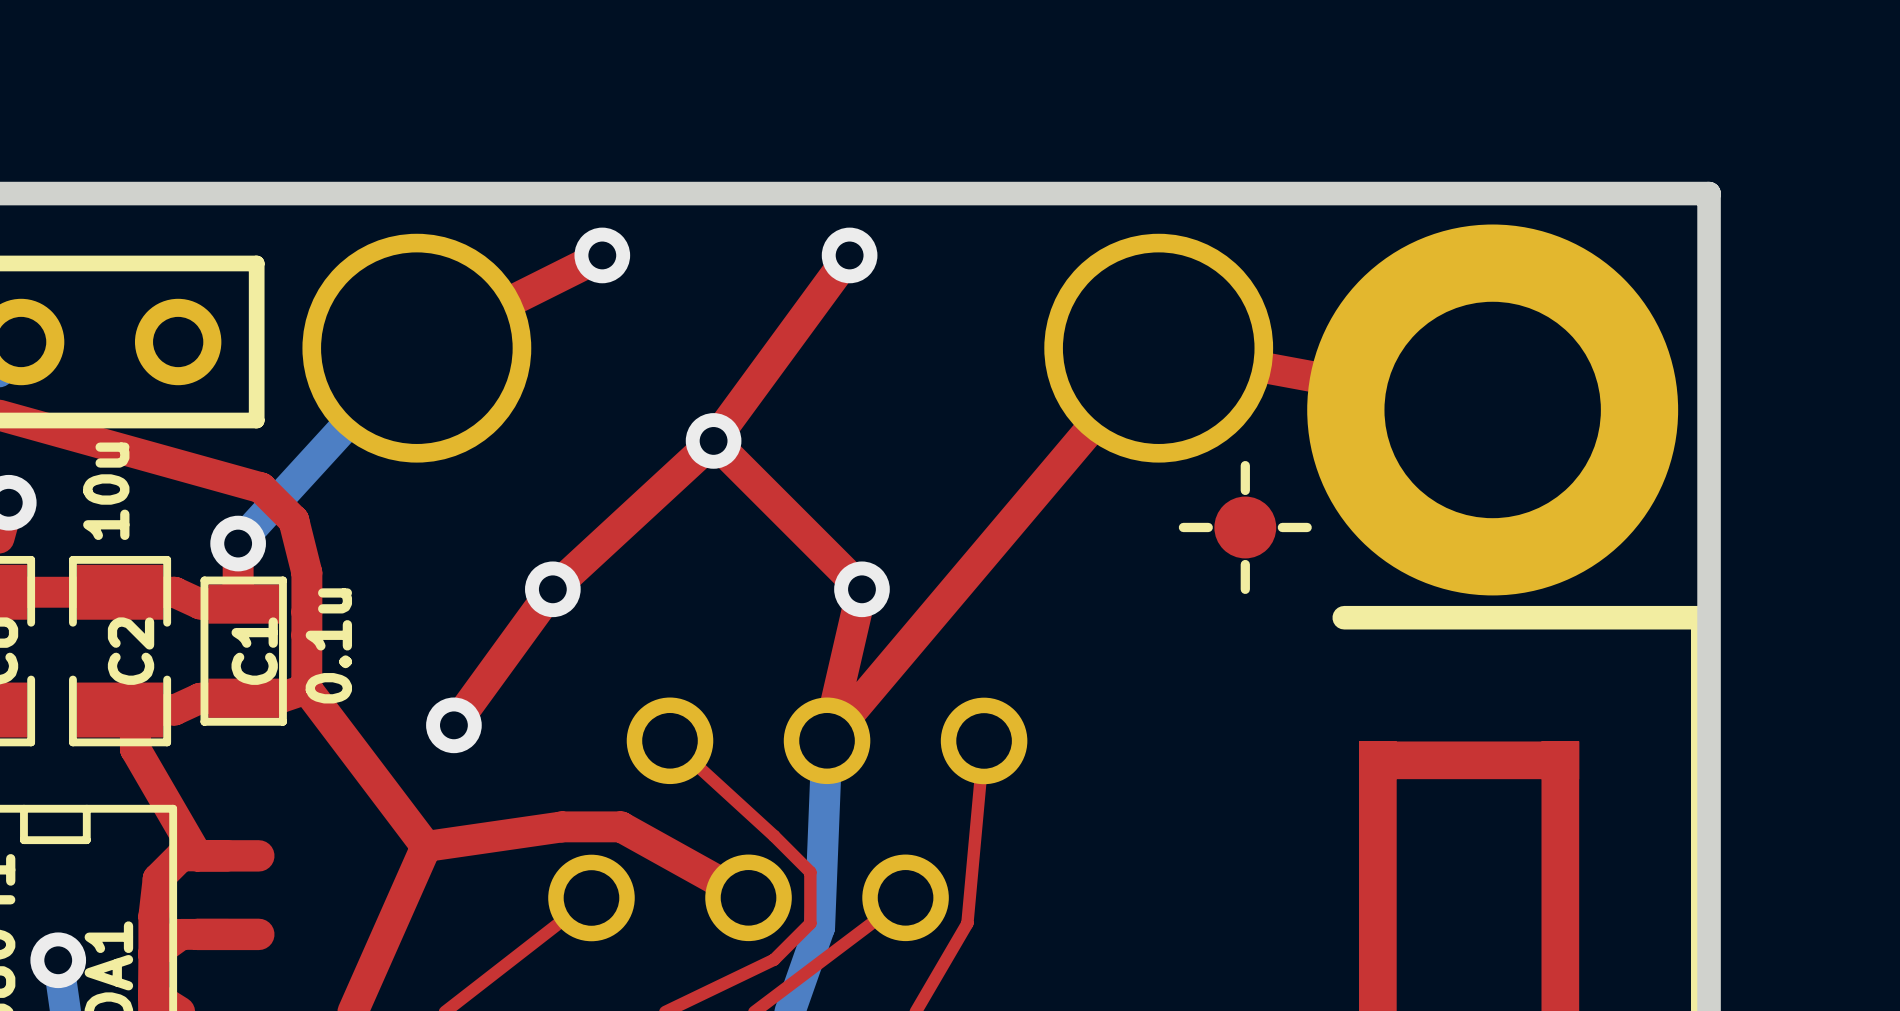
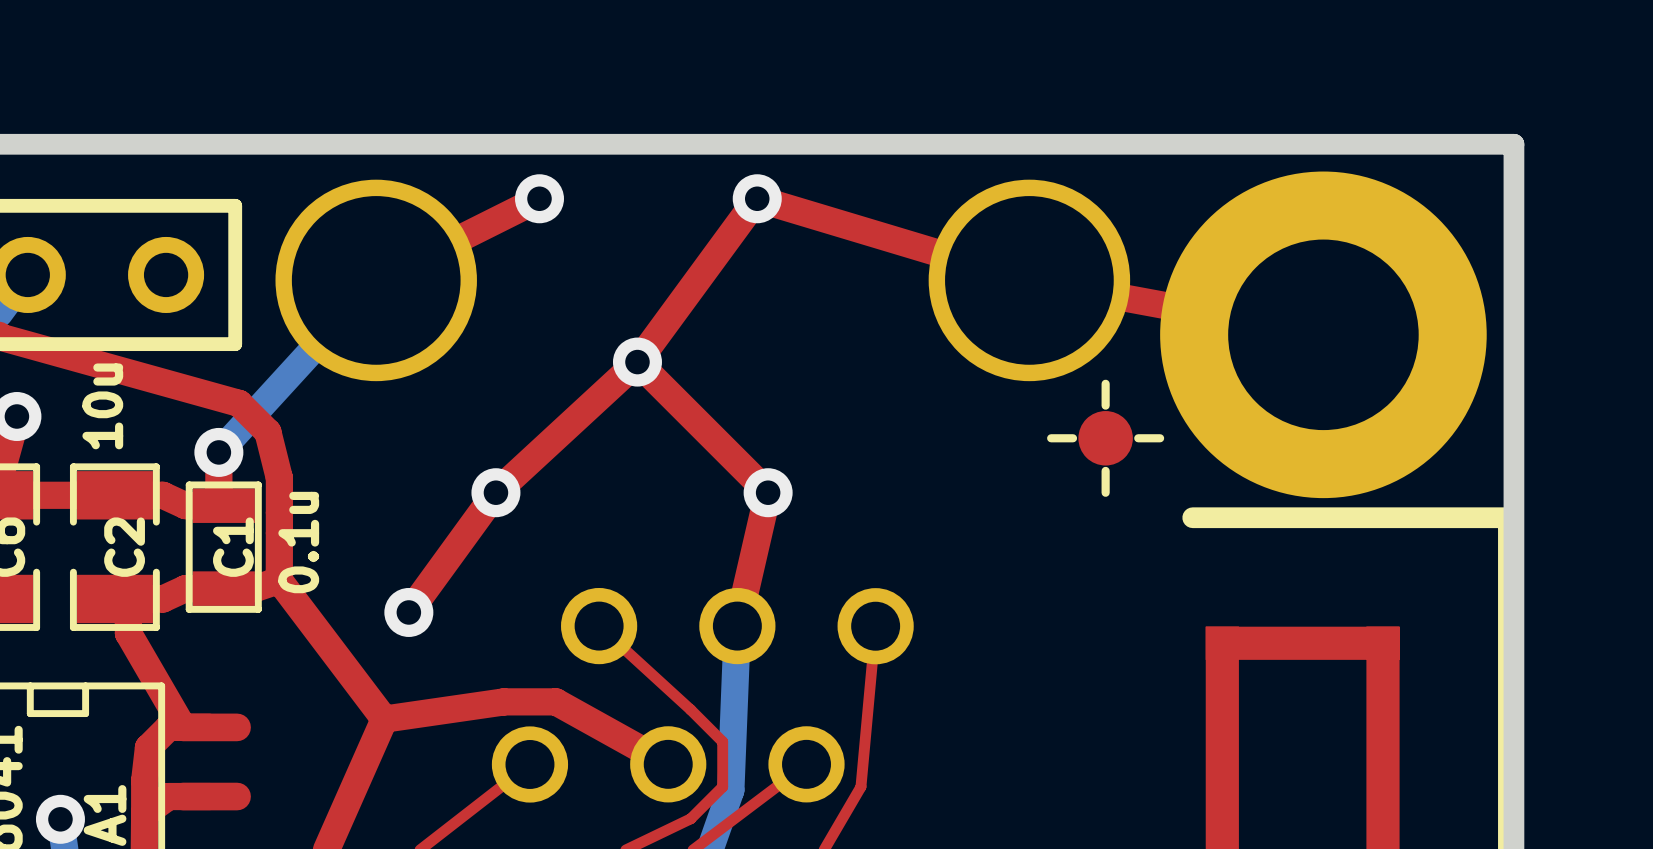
top track: (1158, 348) (827, 740) -> (1029, 280) (757, 198)

